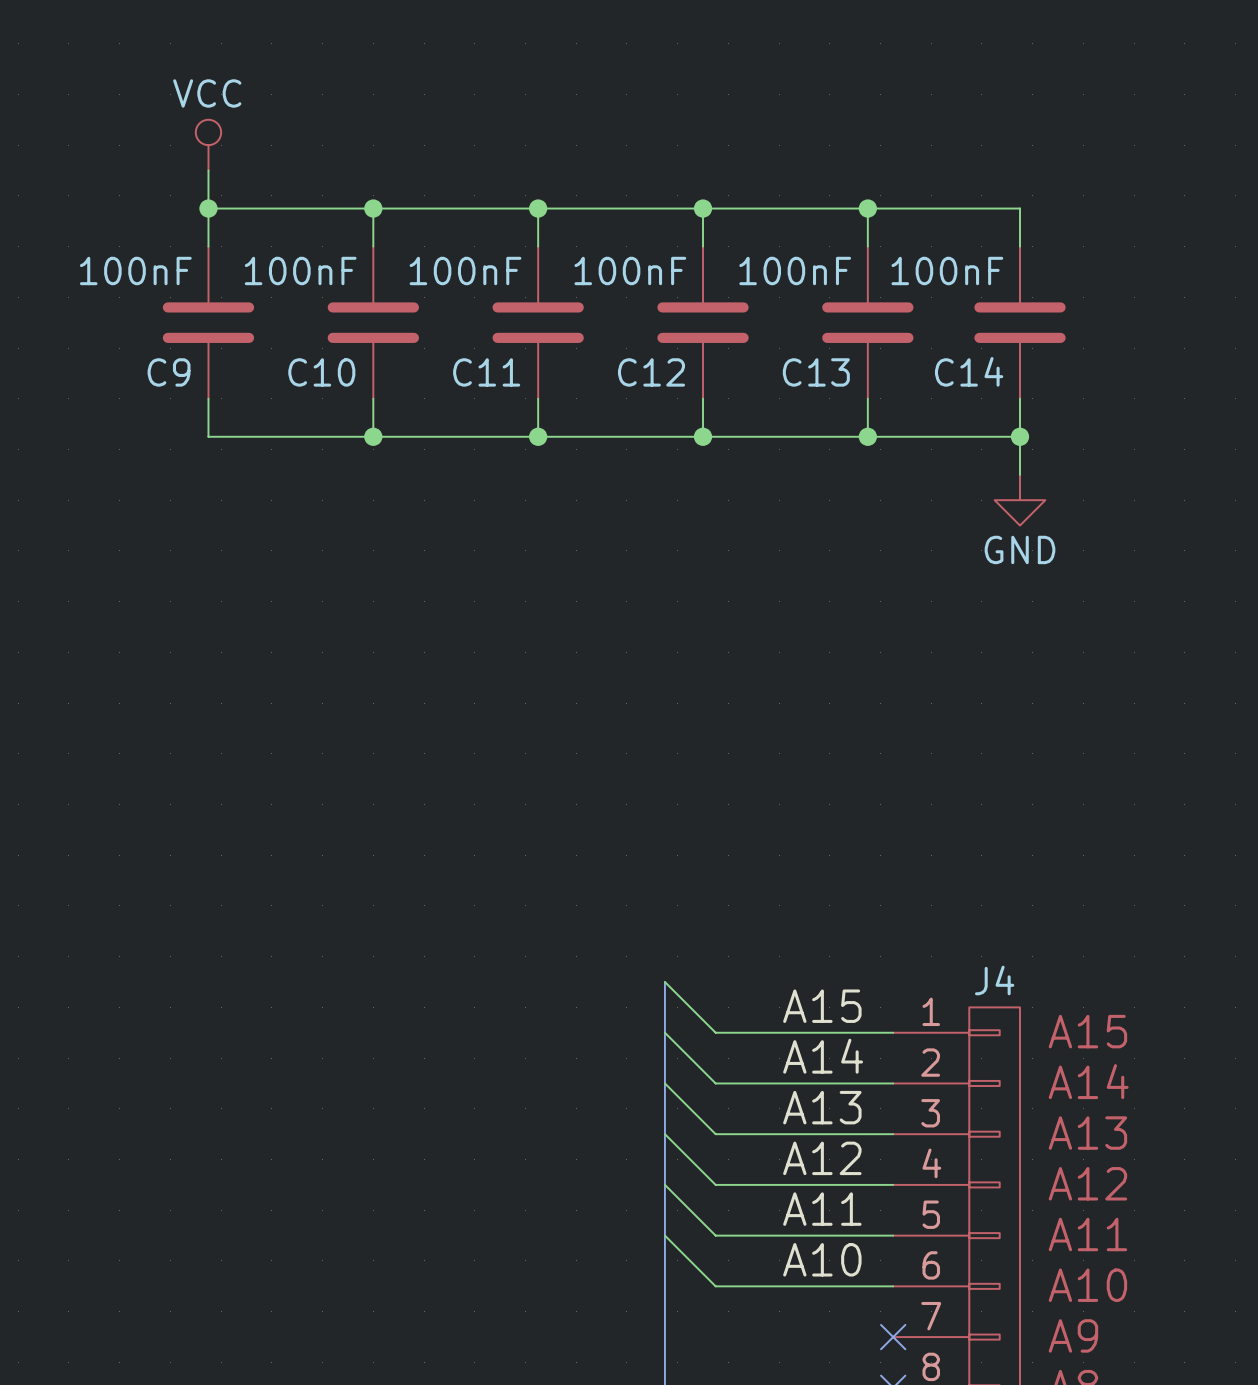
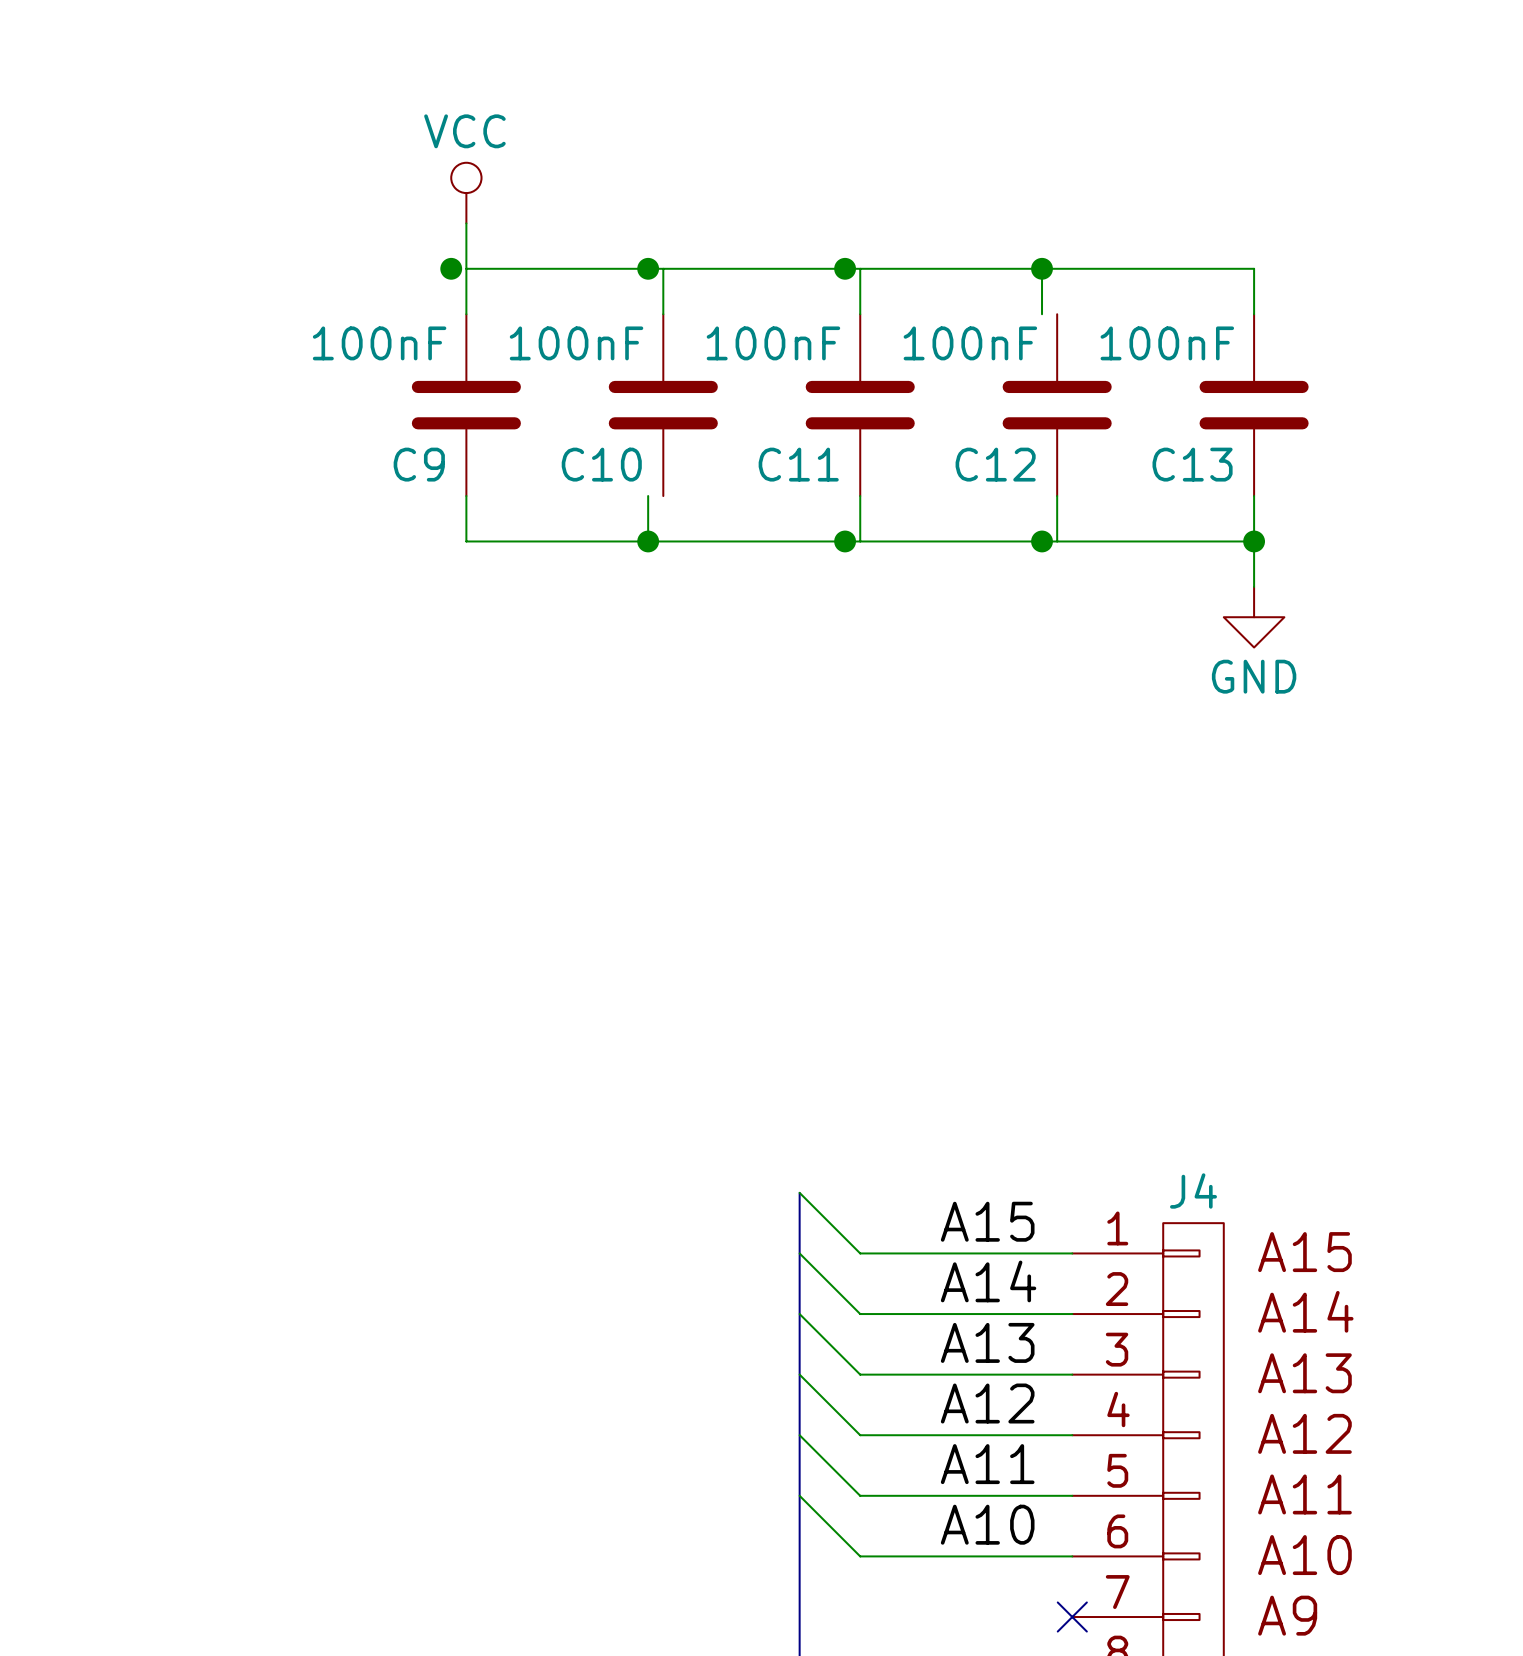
power symbol position: VCC (208, 145) -> VCC (466, 193)
wire: (208, 170) (208, 246) -> (466, 223) (466, 314)
wire: (208, 208) (386, 208) -> none
junction: (208, 208) -> none
wire: (373, 208) (373, 246) -> none
wire: (538, 208) (538, 246) -> (1057, 496) (1057, 541)
wire: (703, 208) (703, 246) -> (860, 496) (860, 541)
wire: (1020, 208) (1020, 246) -> (1223, 268) (1254, 268) (1254, 314)
C9 position: (208, 322) -> (466, 405)
C10 position: (373, 322) -> (663, 405)
C11 position: (538, 322) -> (860, 405)
C12 position: (703, 322) -> (1057, 405)
C13 position: (867, 322) -> (1254, 405)
C14: 100nF (1020, 322) -> none
wire: (208, 398) (208, 436) (386, 436) -> (466, 496) (466, 541)
wire: (373, 398) (373, 436) -> none
wire: (703, 398) (703, 436) -> (663, 268) (663, 314)
wire: (867, 398) (867, 436) -> (860, 268) (860, 314)
wire: (1020, 398) (1020, 474) -> (1254, 496) (1254, 586)
junction: (373, 436) -> none
wire: none -> (1223, 541) (1254, 541)
junction position: (1020, 436) -> (1254, 541)
power symbol position: GND (1020, 500) -> GND (1254, 617)

